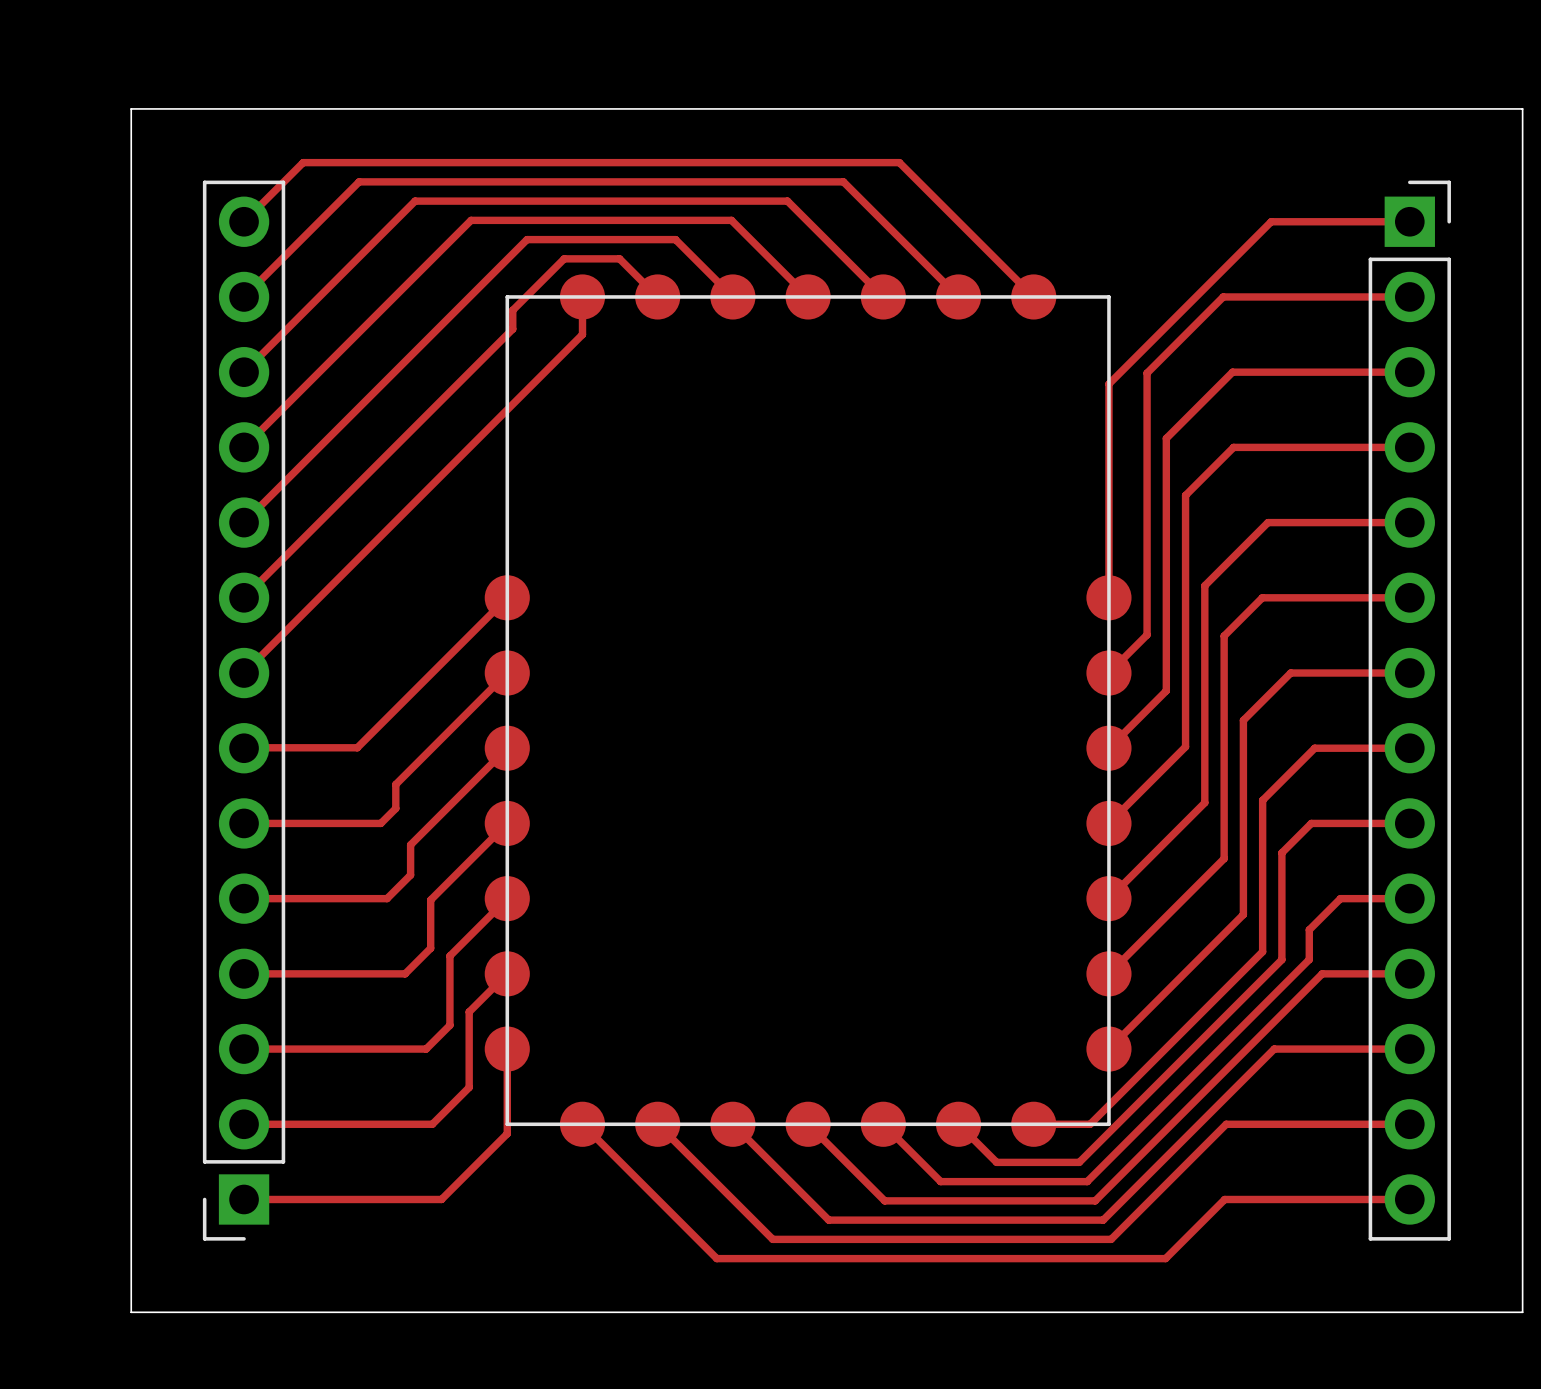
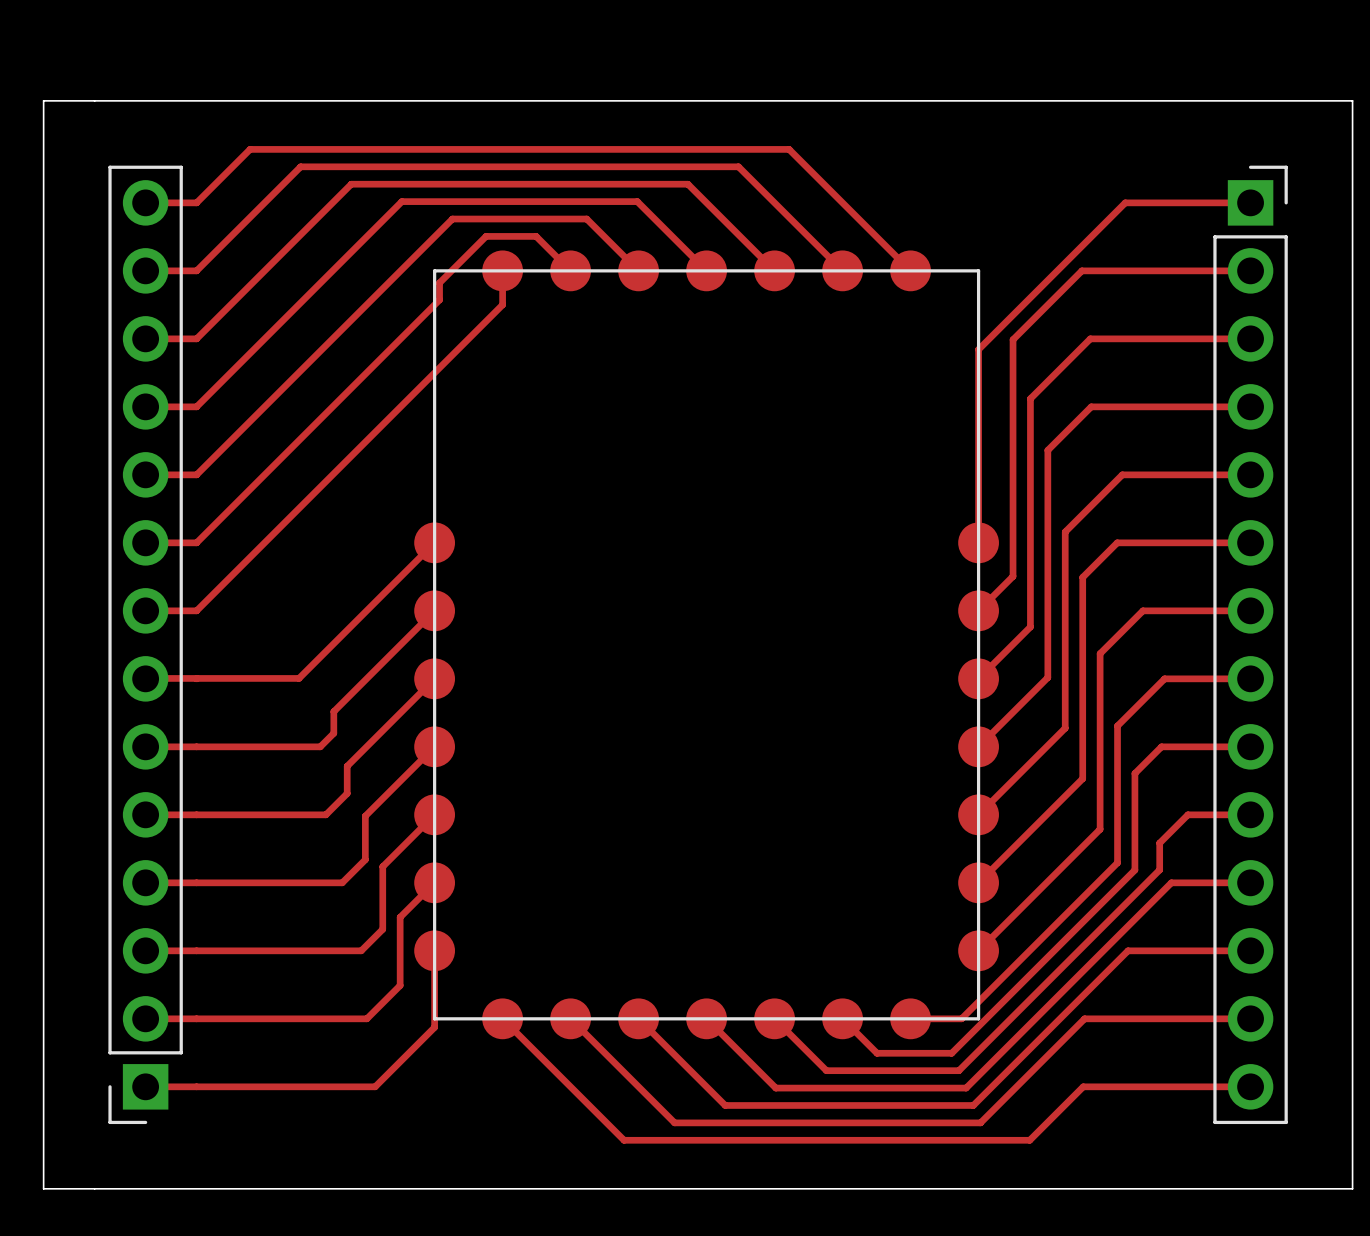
board edge: (131, 108) (131, 1312) -> (94, 100) (43, 100) (43, 1188) (94, 1188)
top track: none -> (145, 202) (196, 202)
top track: none -> (145, 270) (196, 270)
top track: none -> (145, 338) (196, 338)
top track: none -> (145, 406) (196, 406)
top track: none -> (145, 474) (196, 474)
top track: none -> (145, 542) (196, 542)
top track: none -> (145, 610) (196, 610)
part position: (244, 710) -> (145, 644)
top track: none -> (197, 678) (145, 678)
top track: none -> (145, 746) (196, 746)
top track: none -> (145, 814) (196, 814)
top track: none -> (145, 882) (196, 882)
top track: none -> (145, 950) (196, 950)
top track: none -> (145, 1018) (196, 1018)
top track: none -> (145, 1086) (196, 1086)

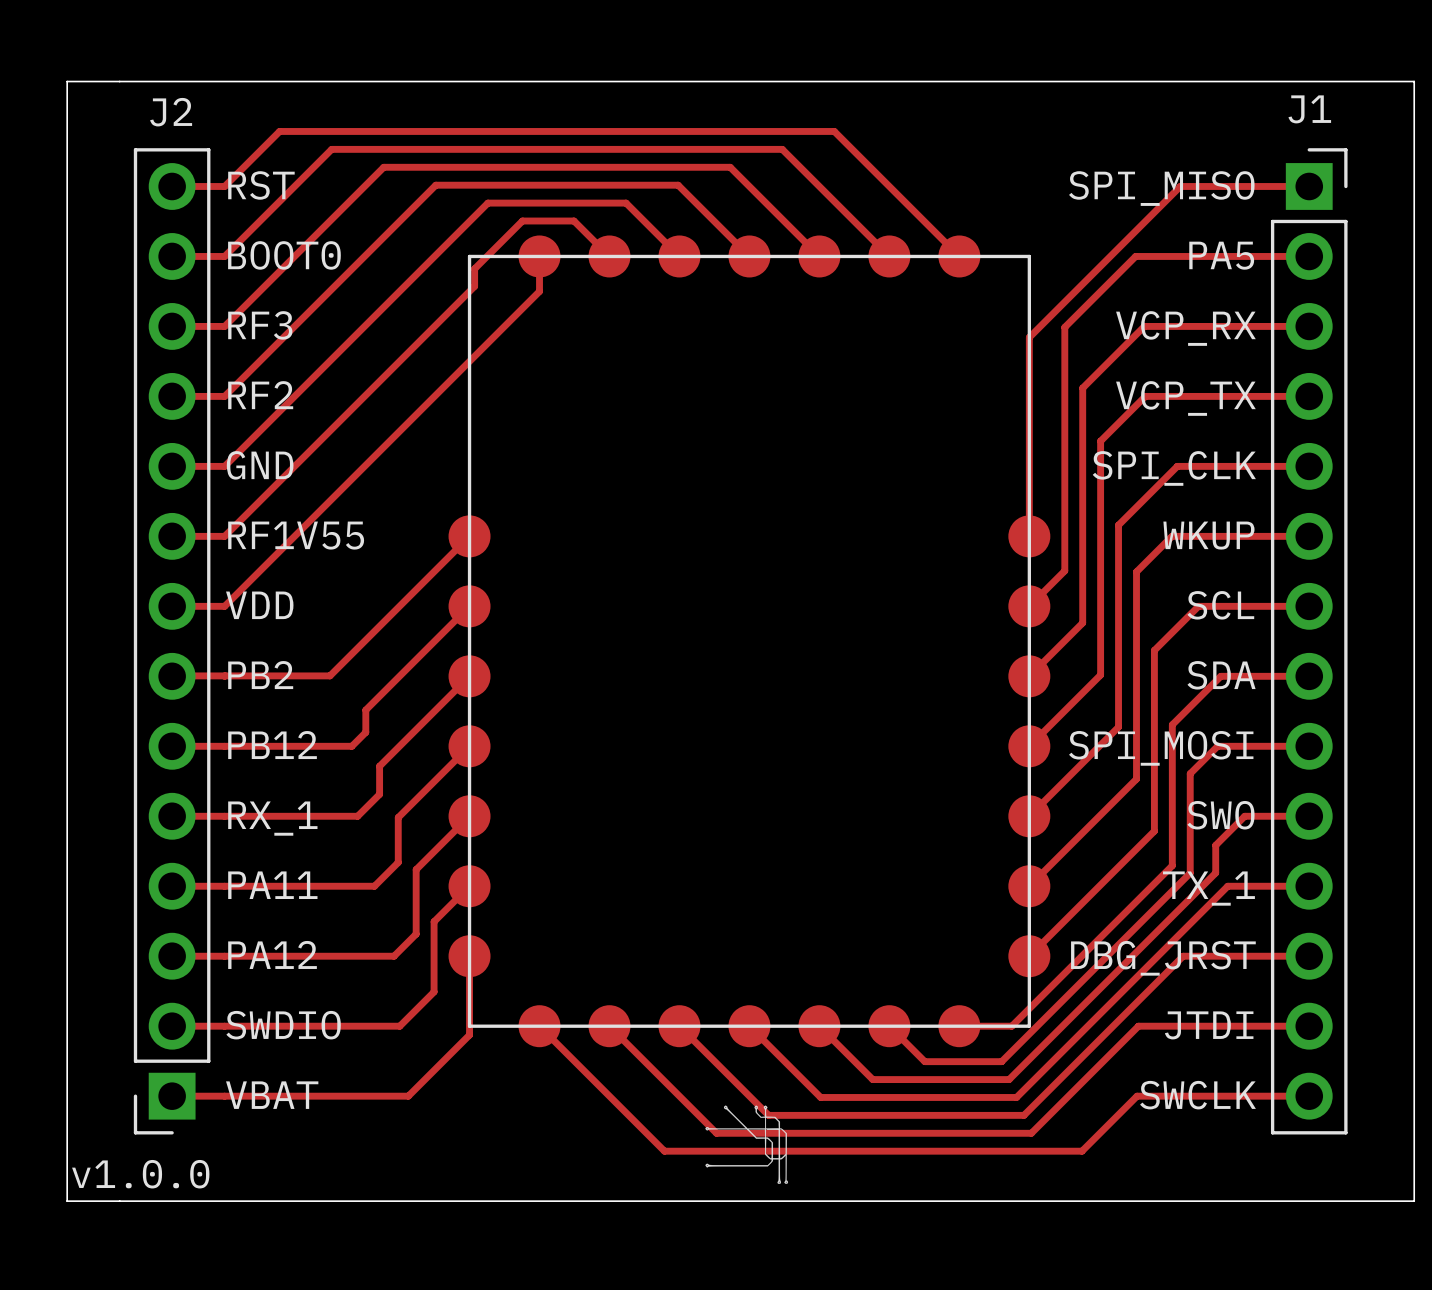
J1 name: none -> J1 (1309, 109)
J2 name: none -> J2 (171, 112)
text: none -> RST (261, 185)
text: none -> SPI_MISO (1161, 188)
text: none -> BOOT0 (284, 255)
text: none -> PA5 (1221, 255)
text: none -> RF3 (260, 325)
text: none -> VCP_RX (1185, 328)
text: none -> RF2 (260, 395)
text: none -> VCP_TX (1185, 398)
text: none -> GND (260, 465)
text: none -> SPI_CLK (1174, 468)
text: none -> RF1V55 (296, 535)
text: none -> WKUP (1208, 535)
text: none -> VDD (259, 605)
text: none -> SCL (1220, 605)
text: none -> PB2 (260, 675)
text: none -> SDA (1221, 675)
text: none -> PB12 (272, 745)
text: none -> SPI_MOSI (1161, 748)
text: none -> SWO (1221, 815)
text: none -> RX_1 (272, 818)
text: none -> PA11 (272, 885)
text: none -> TX_1 (1208, 888)
text: none -> PA12 (272, 954)
text: none -> DBG_JRST (1163, 958)
text: none -> SWDIO (283, 1025)
text: none -> JTDI (1209, 1025)
text: none -> VBAT (272, 1095)
text: none -> SWCLK (1198, 1095)
drawing: none -> [705, 1105, 789, 1184]
text: none -> v1.0.0 (140, 1174)

